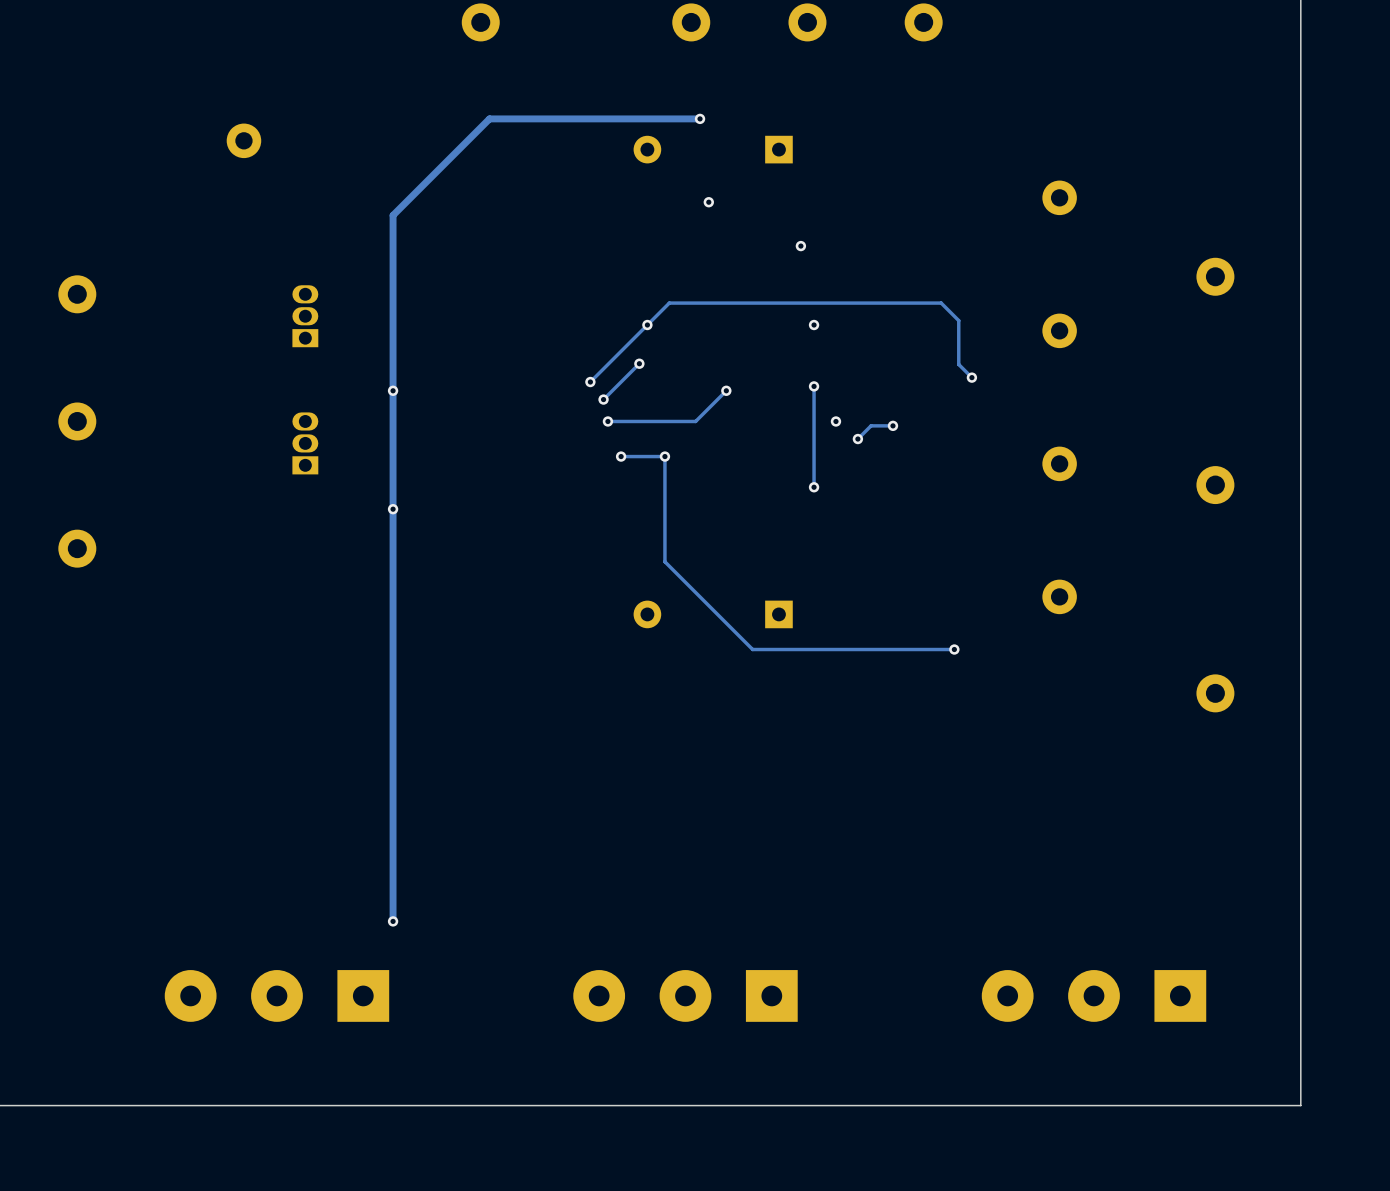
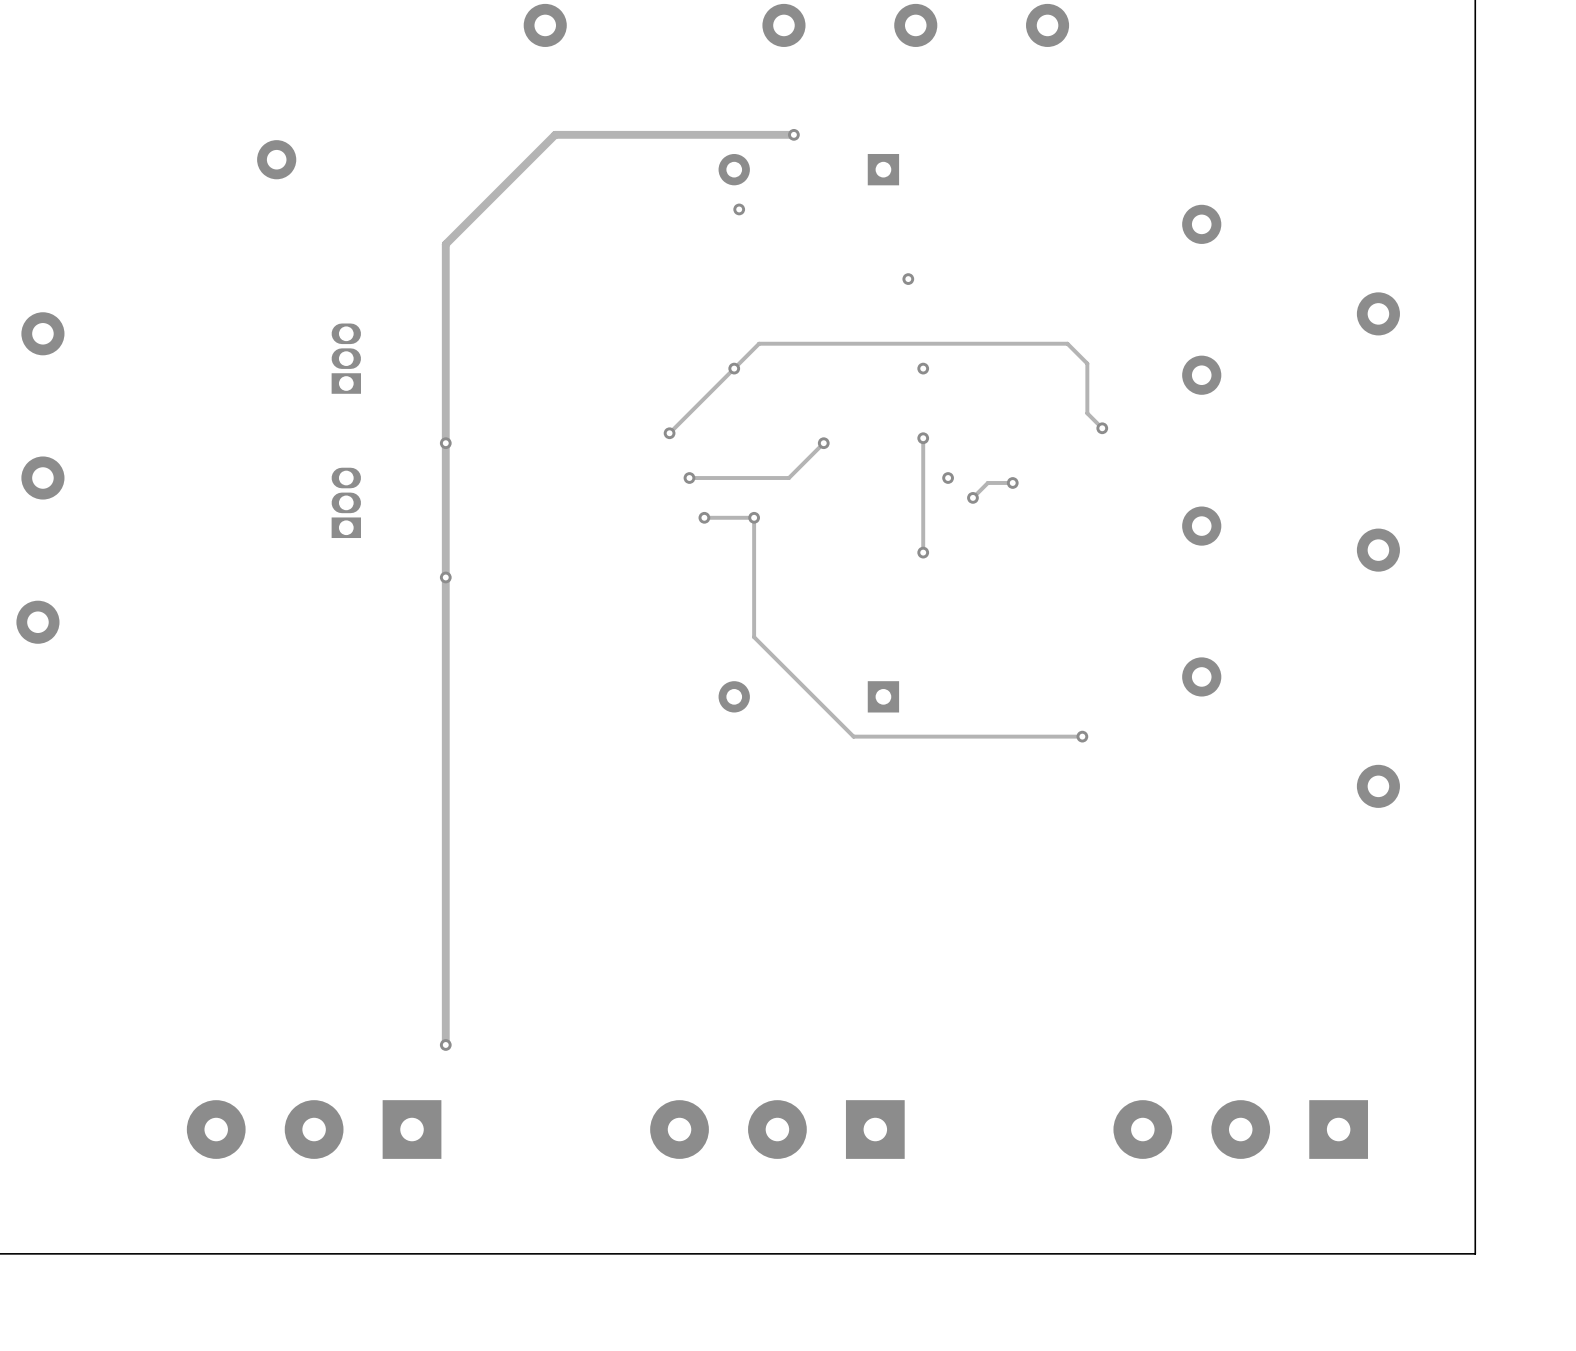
via position: (708, 202) -> (739, 209)
part position: (77, 294) -> (42, 333)
track: (639, 363) (603, 399) -> none
via: (639, 363) -> none
via: (603, 399) -> none
part position: (77, 421) -> (42, 478)
part position: (77, 548) -> (37, 622)

